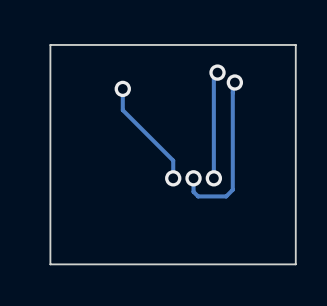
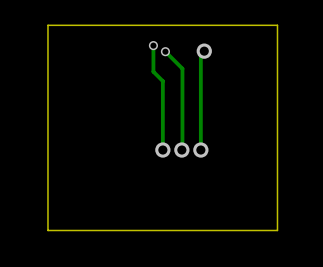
via: none -> (153, 45)
track: none -> (165, 51) (182, 68) (182, 151)
via: none -> (165, 51)
track: (234, 82) (232, 84) (232, 189) (226, 196) (198, 196) (193, 191) (194, 178) -> none
via: (234, 82) -> none
track: (122, 88) (122, 110) (173, 160) -> (153, 45) (153, 71) (162, 81) (162, 133)
via: (122, 88) -> none

